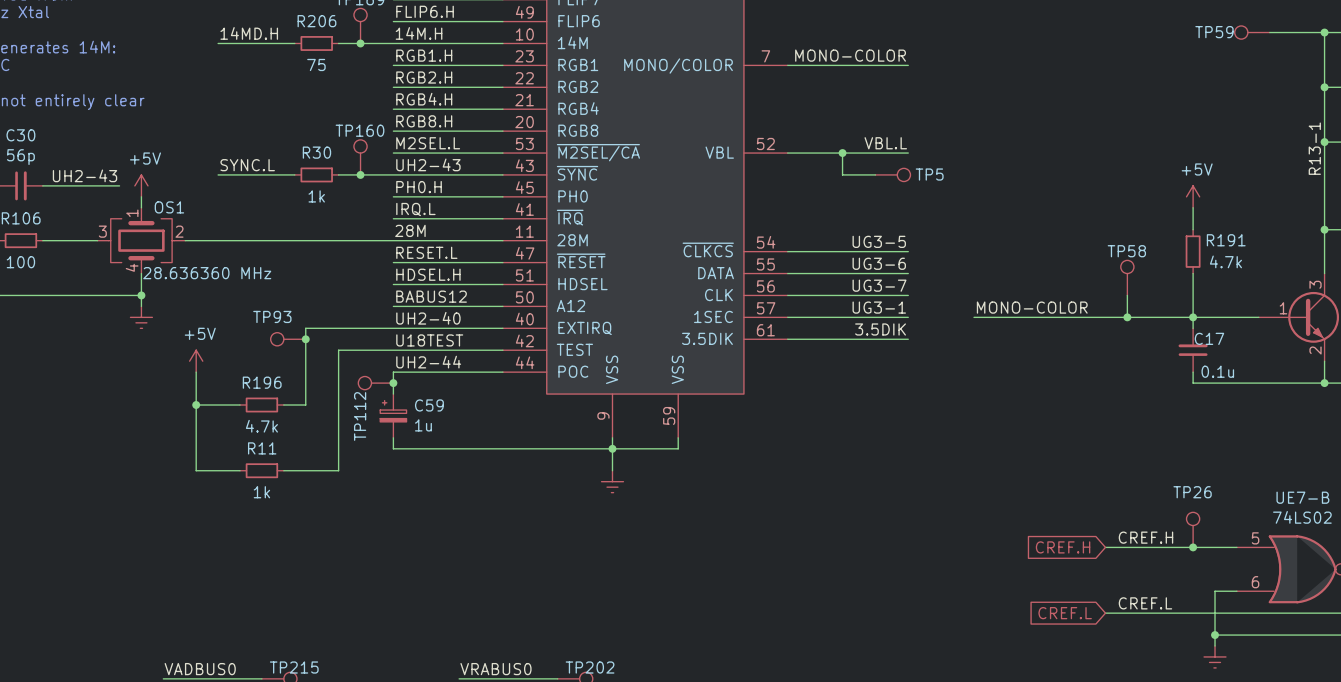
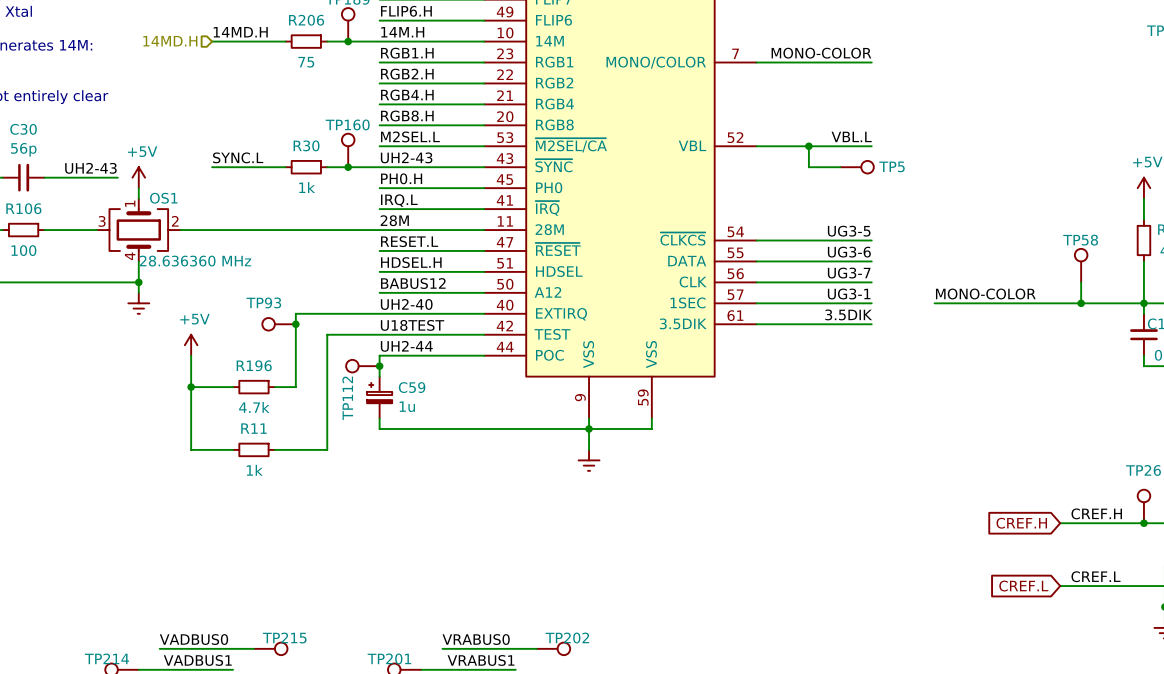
hierarchical label: none -> 14MD.H (170, 41)

